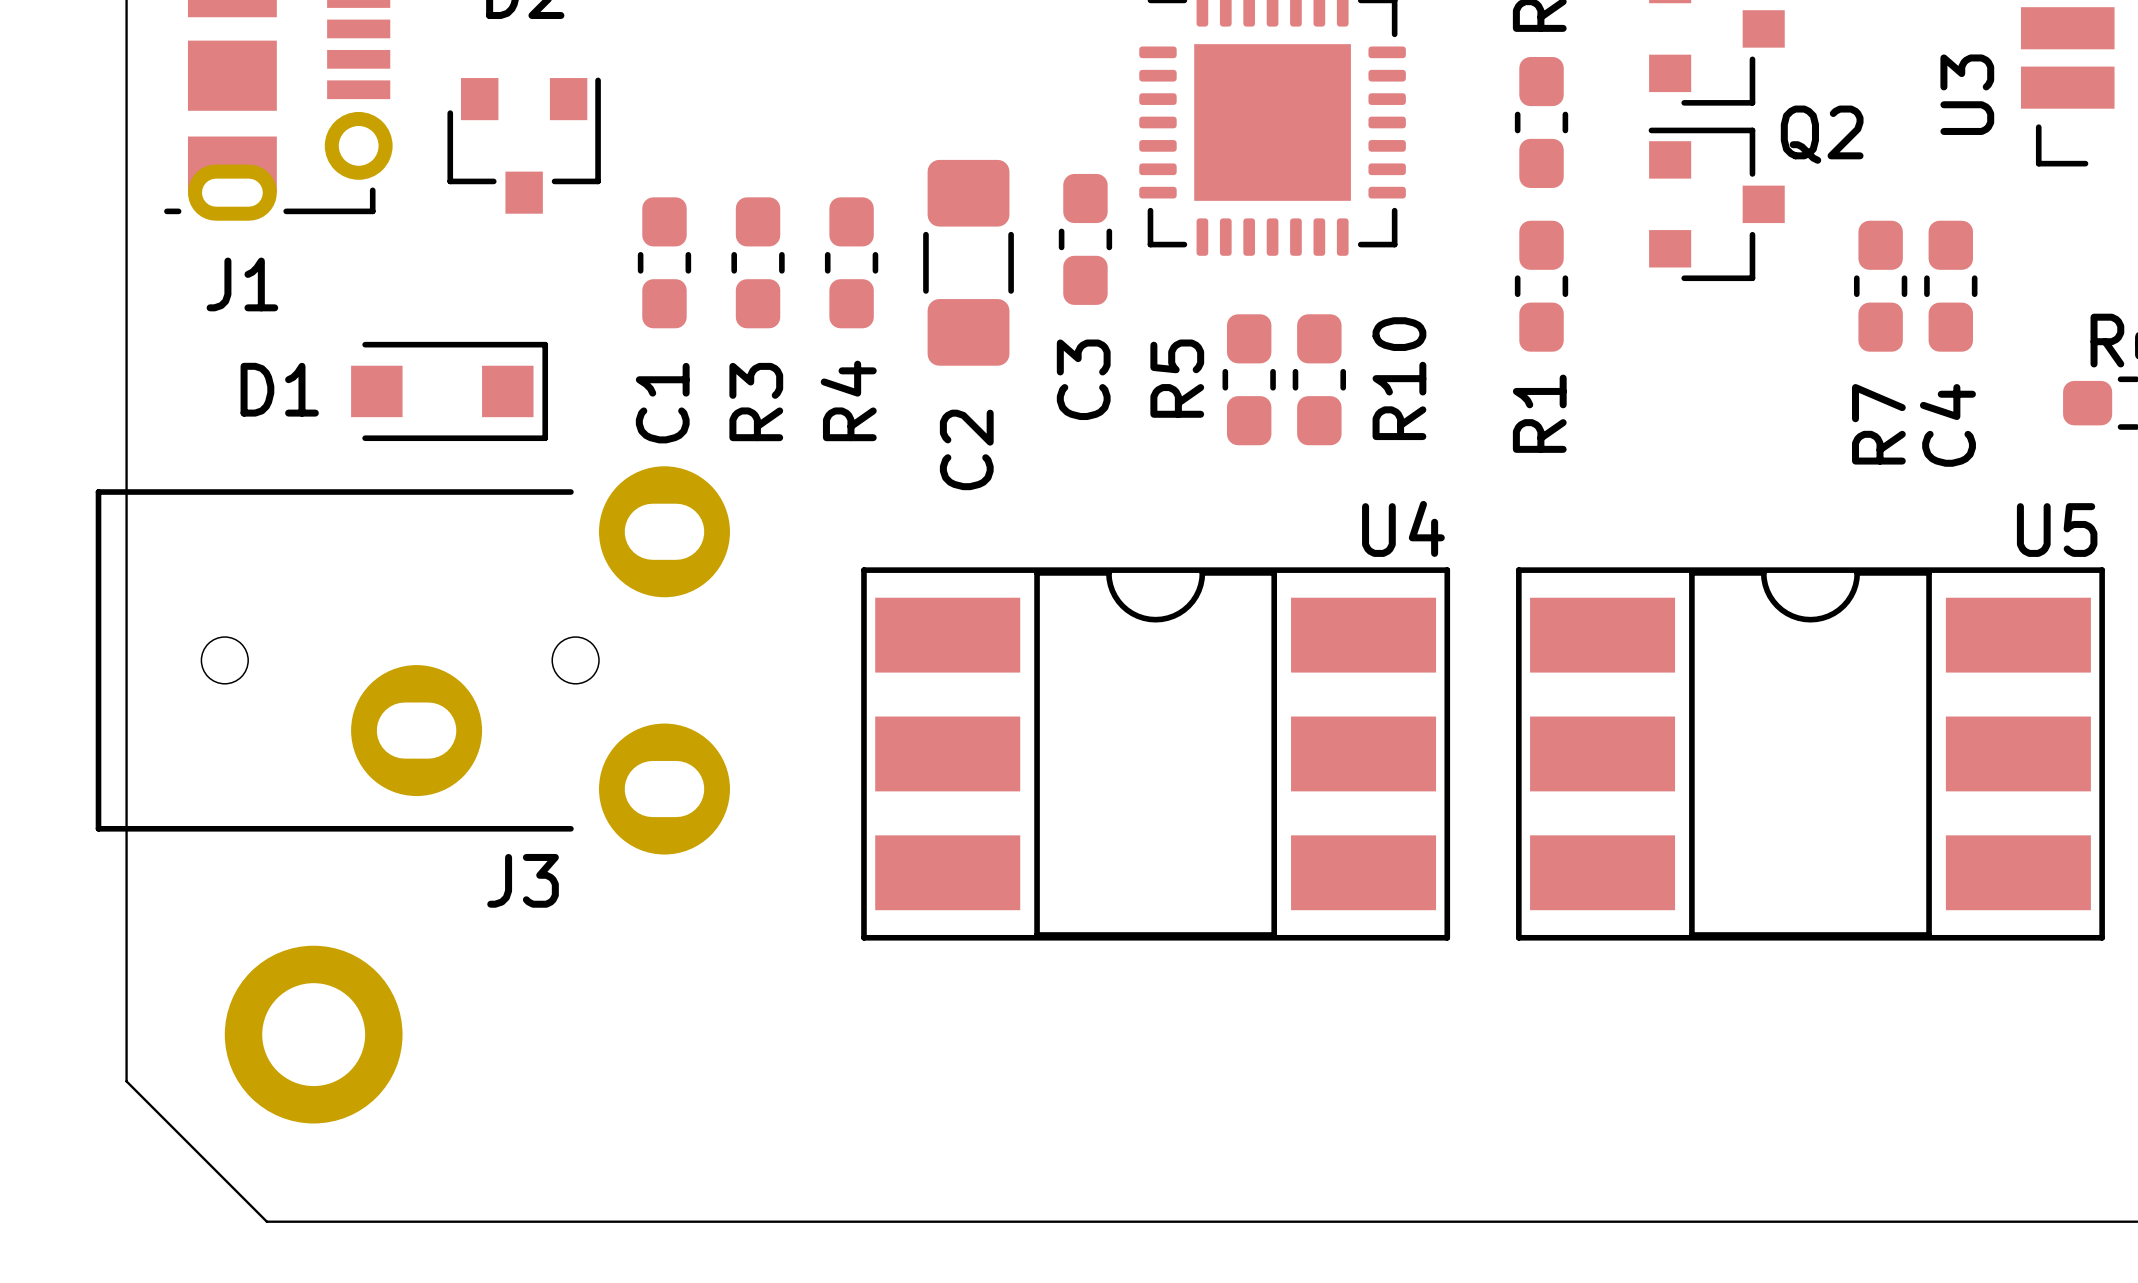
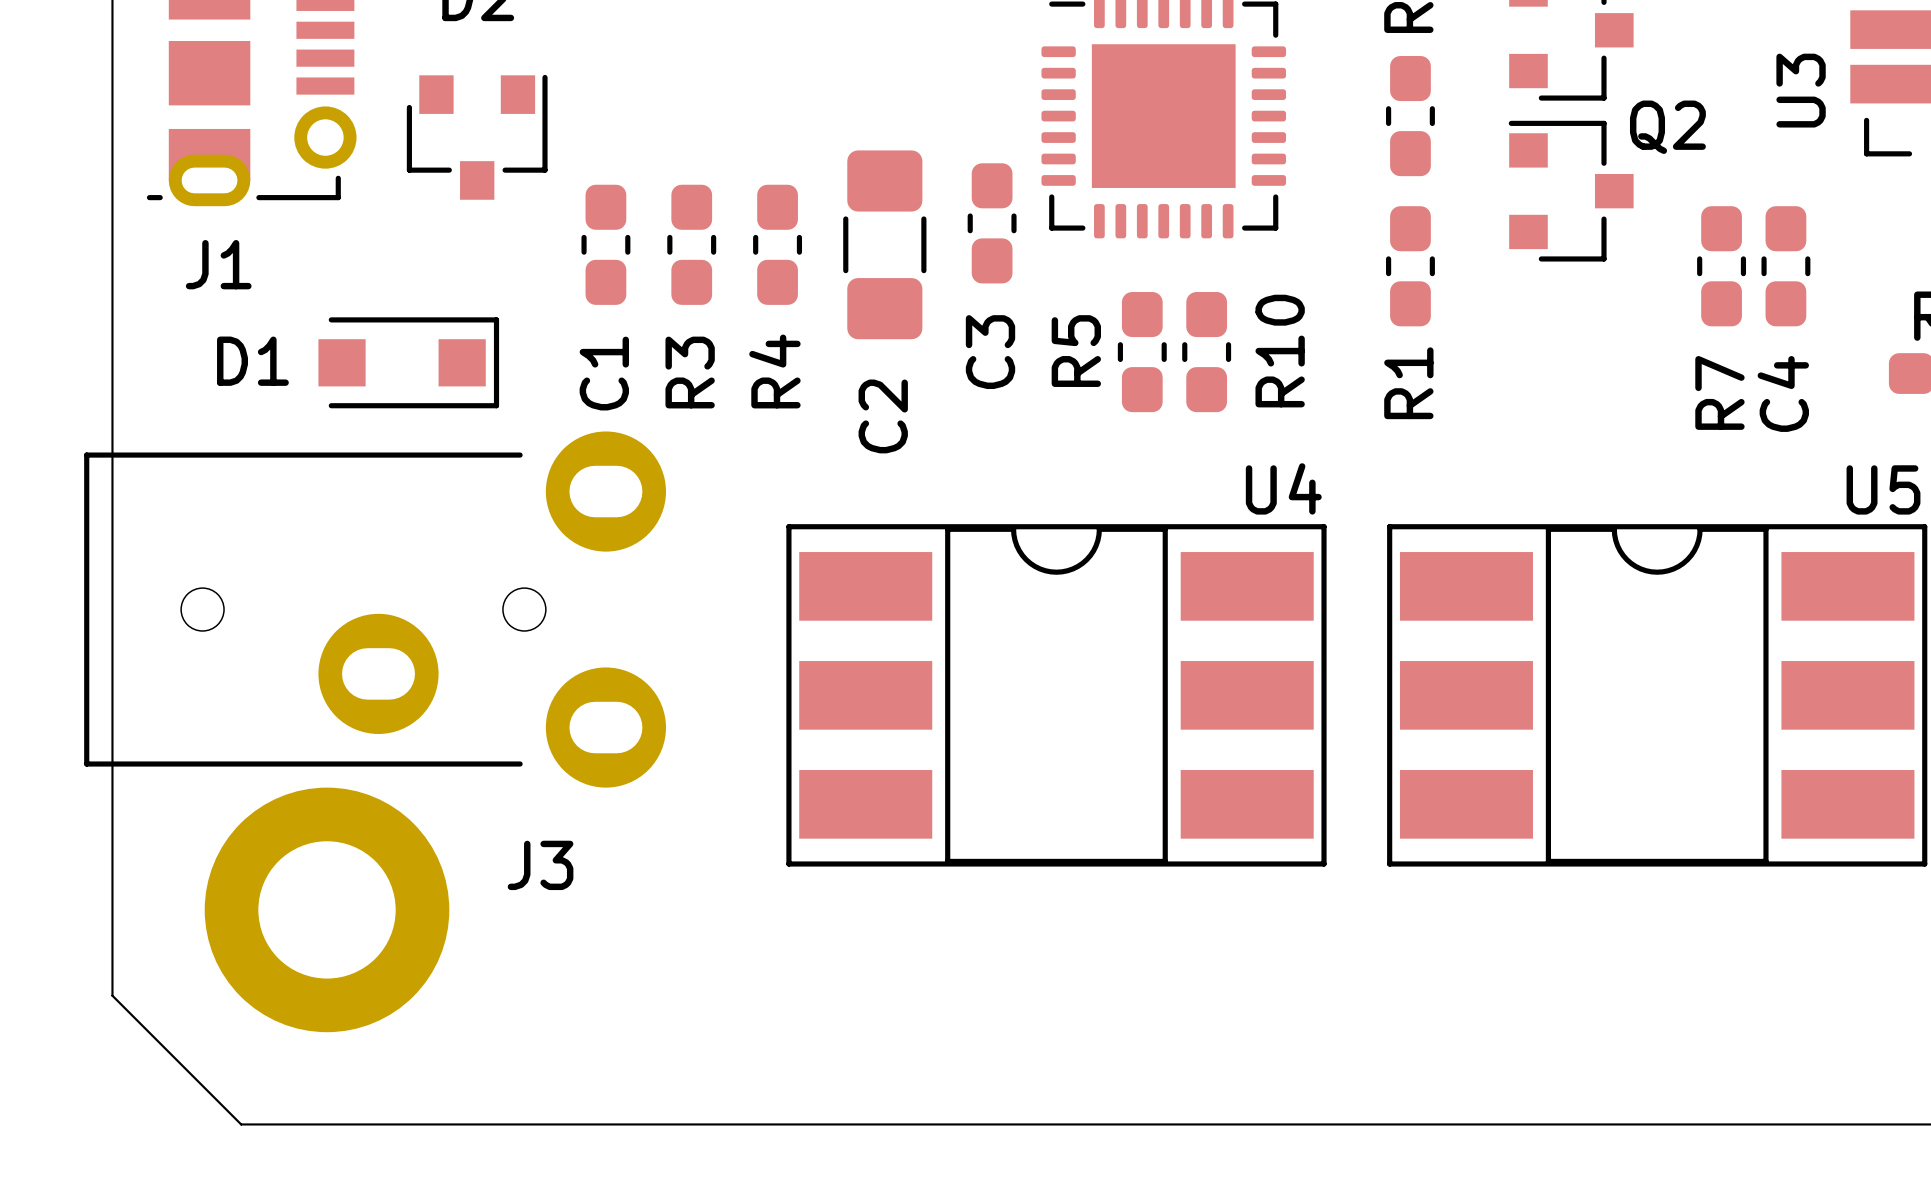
J3 name position: J3 (523, 880) -> J3 (540, 865)
part: none -> (327, 909)
part: (313, 1034) -> none

